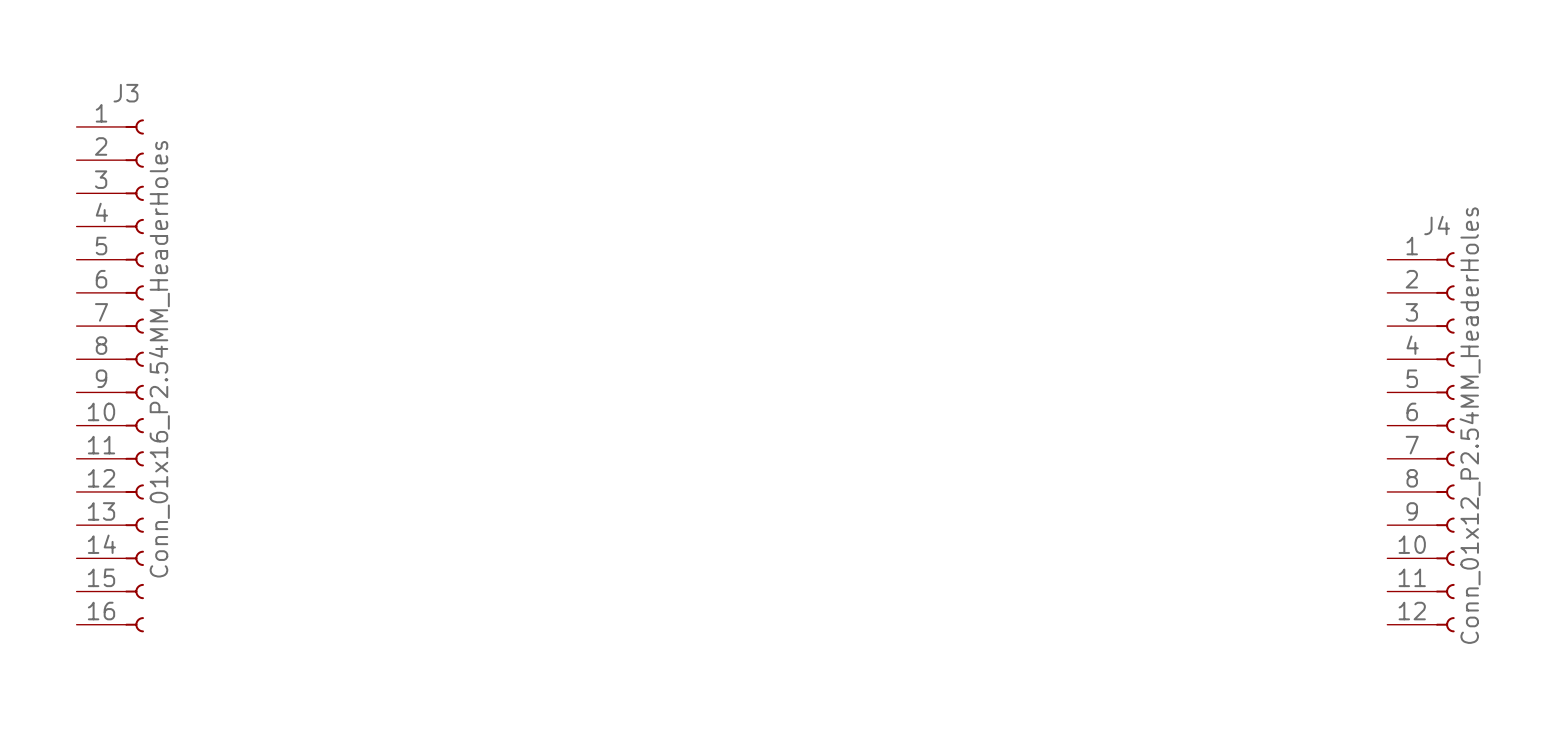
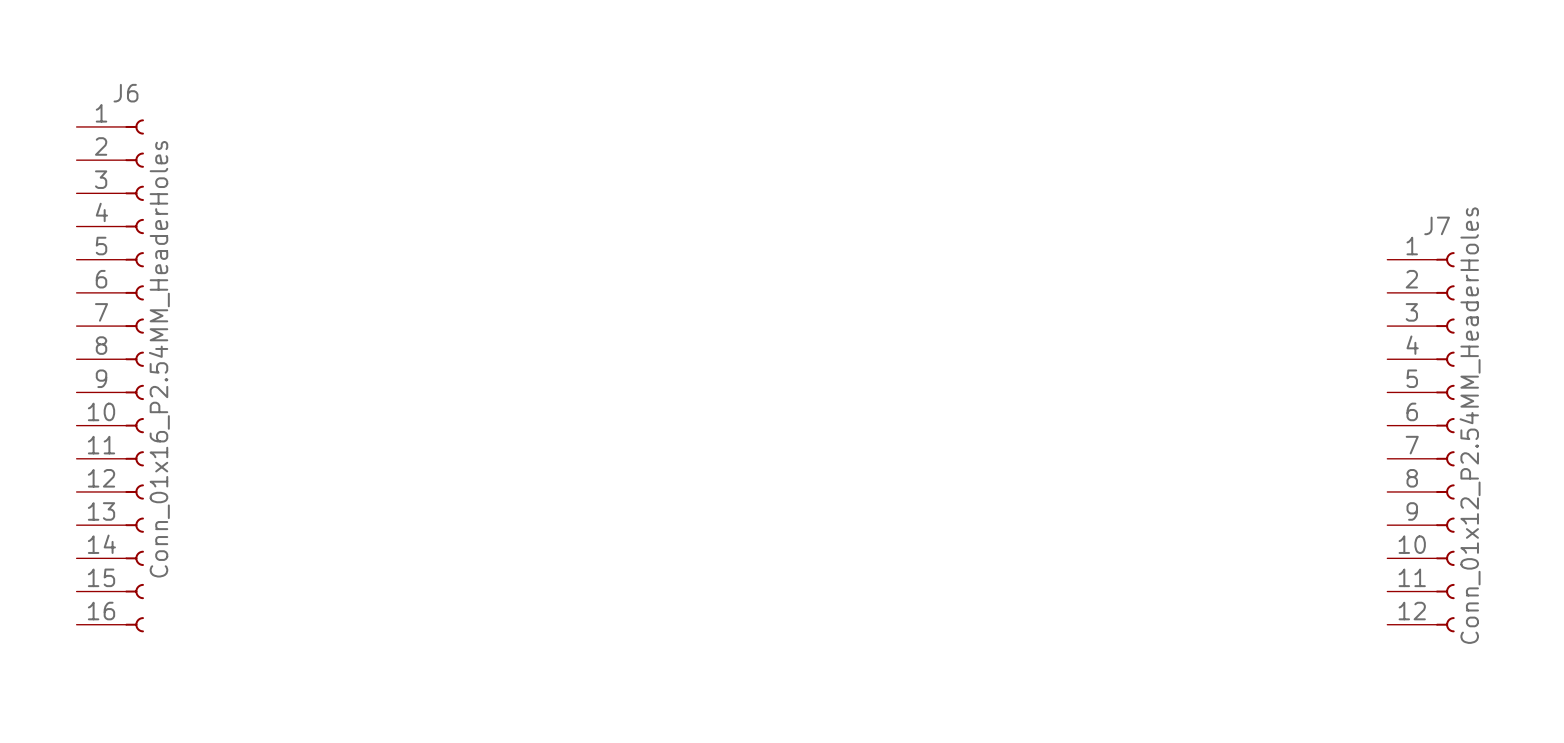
J3 name: J3 (126, 93) -> J6 (126, 93)
J4 name: J4 (1437, 225) -> J7 (1437, 225)

